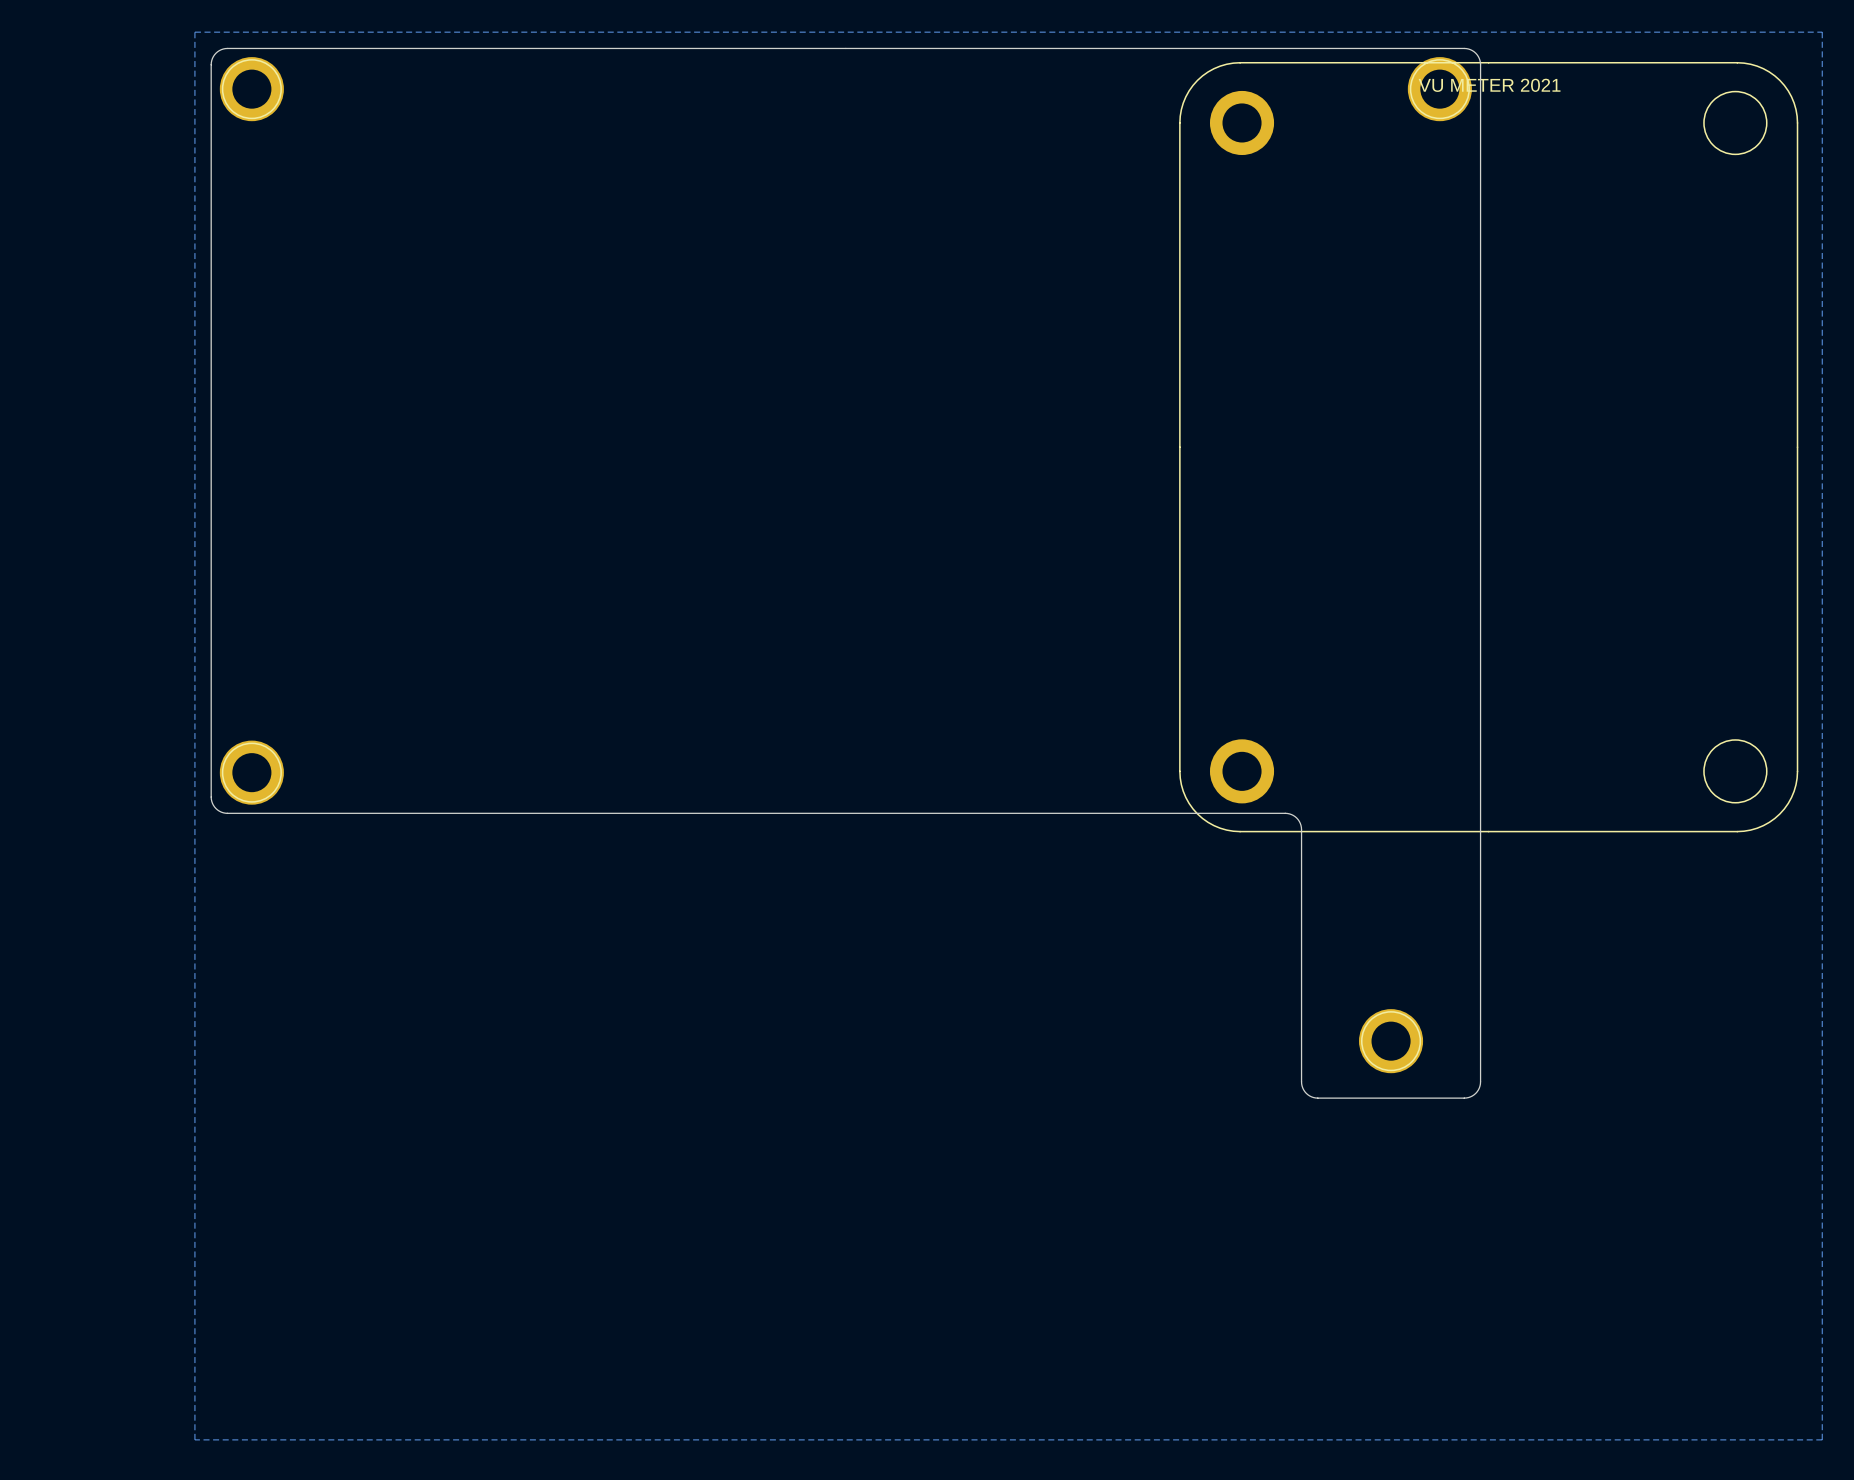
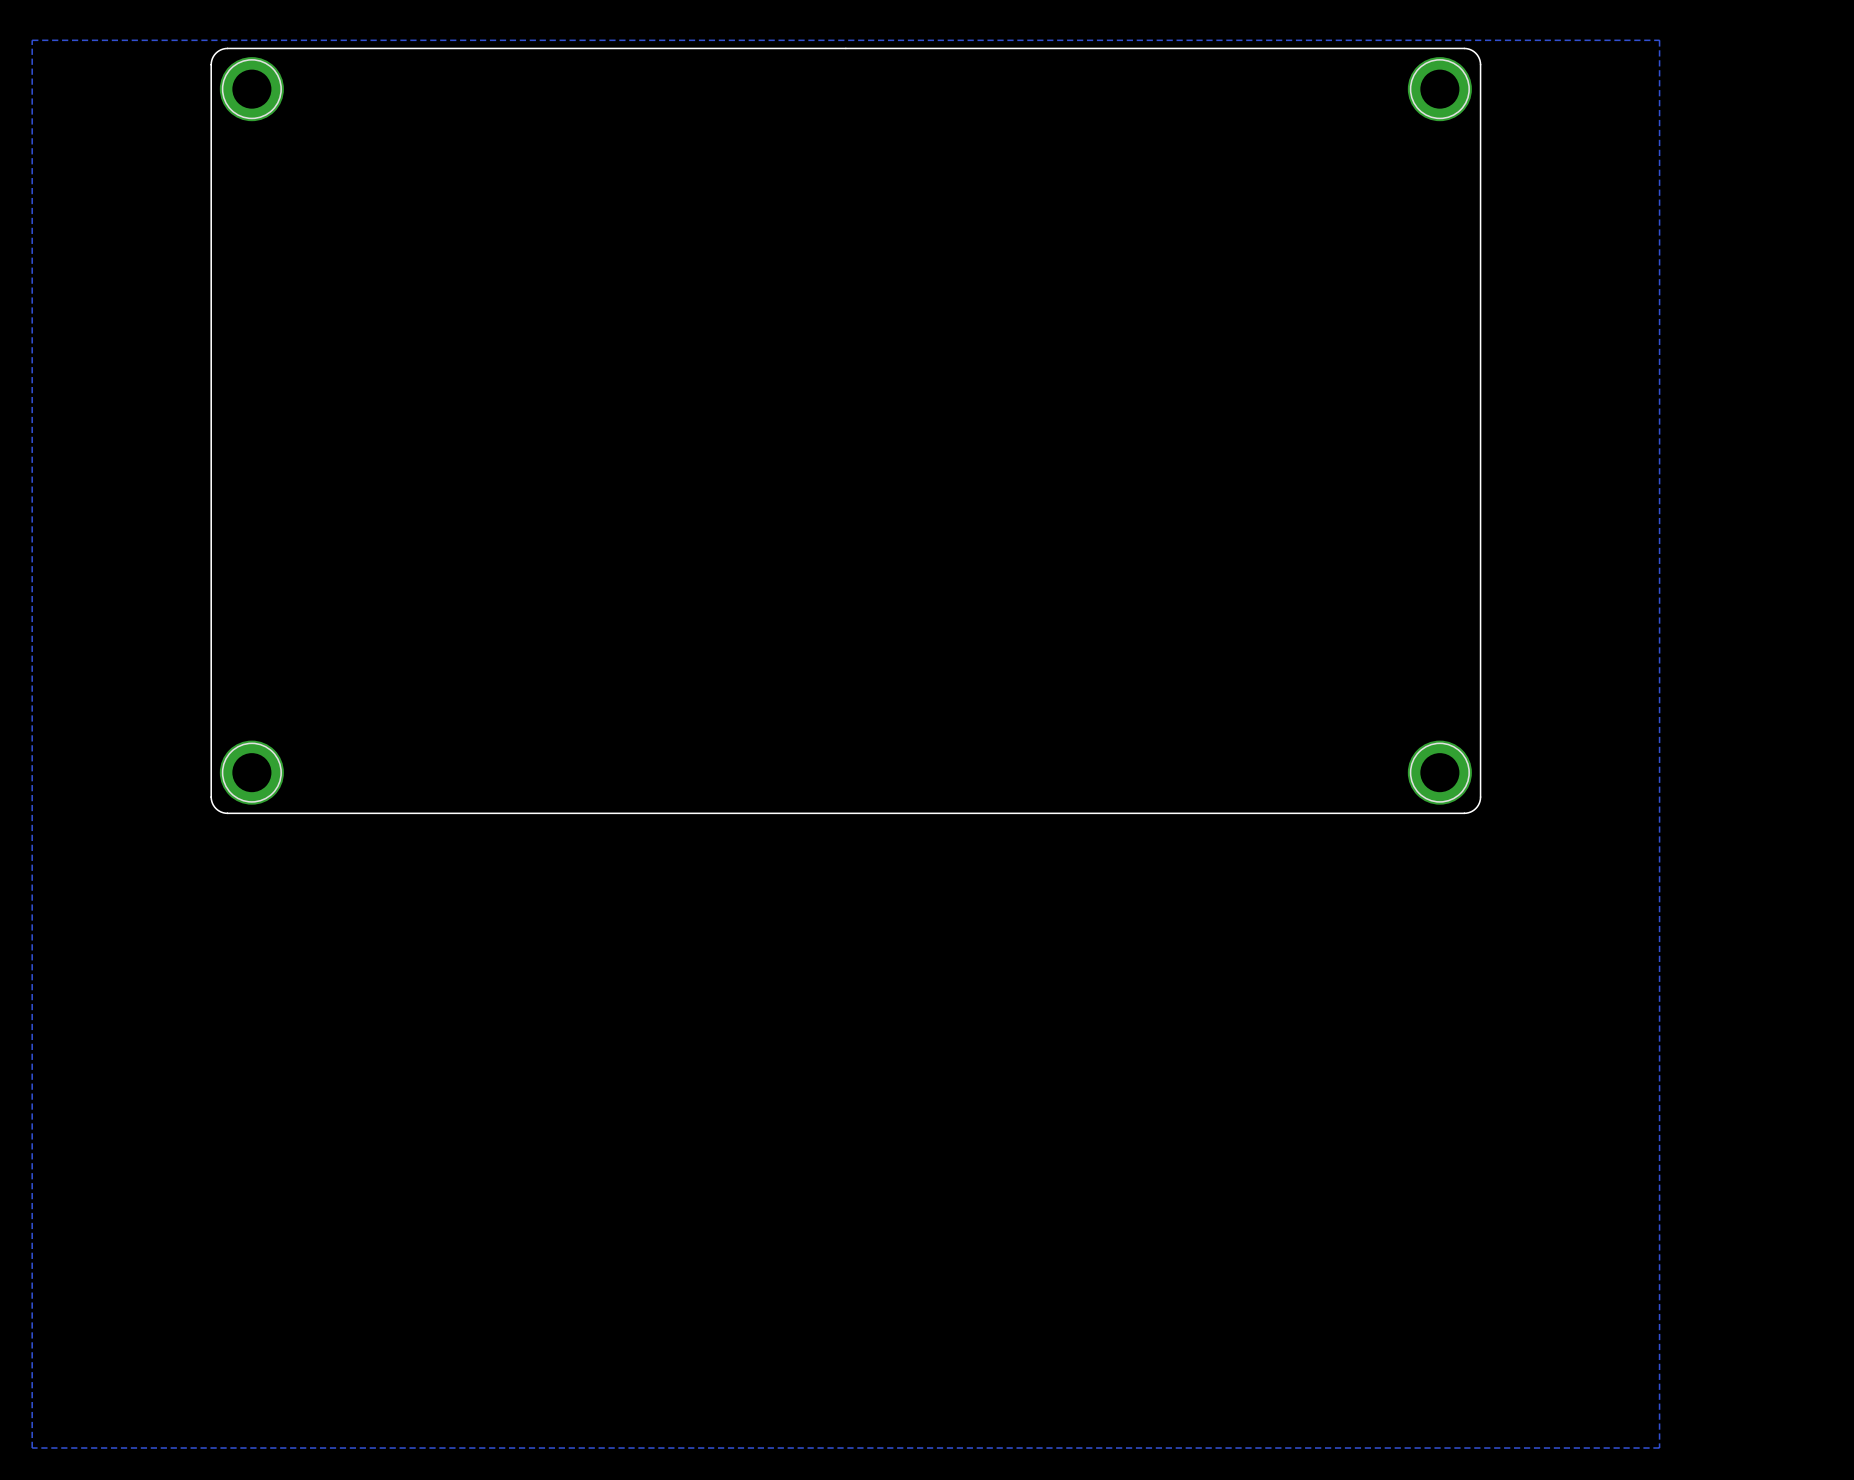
bottom zone outline: (194, 32) (194, 1439) (1822, 1439) (1822, 32) (194, 32) -> (32, 40) (32, 1448) (1659, 1448) (1659, 40) (32, 40)
part: (1488, 447) -> none
board edge: (1480, 797) (1480, 1081) (1477, 1091) (1466, 1097) (1317, 1098) (1309, 1095) (1303, 1089) (1301, 1081) (1301, 827) (1295, 816) (1285, 813) -> (1480, 797) (1475, 808) (1466, 813) (1285, 813)
part position: (1391, 1041) -> (1439, 772)

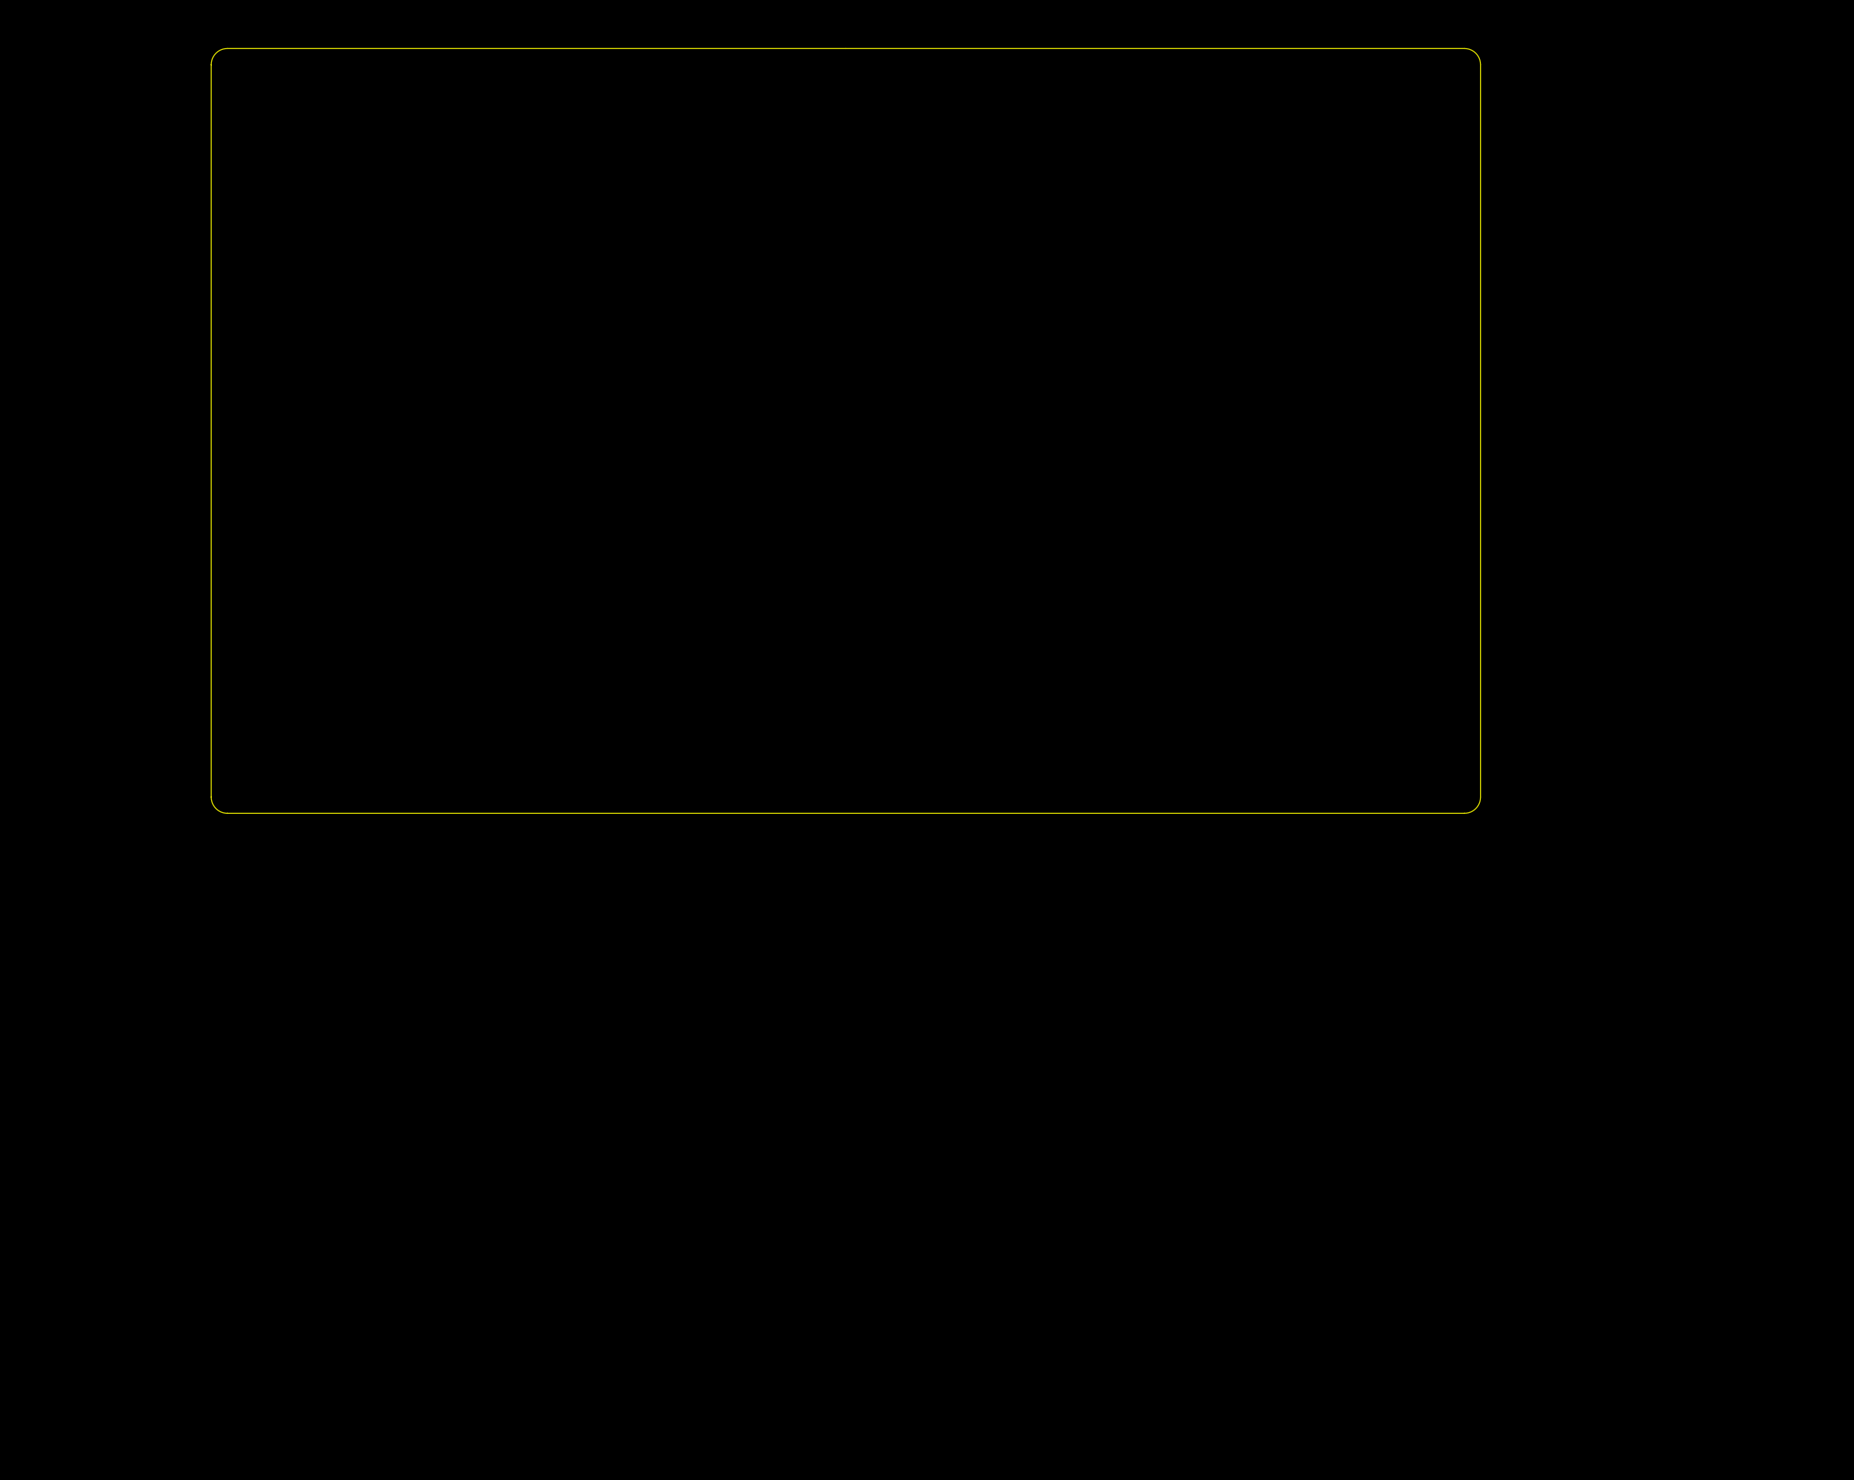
bottom zone outline: (32, 40) (32, 1448) (1659, 1448) (1659, 40) (32, 40) -> none
part: (251, 89) -> none
part: (1439, 89) -> none
part: (251, 772) -> none
part: (1439, 772) -> none

